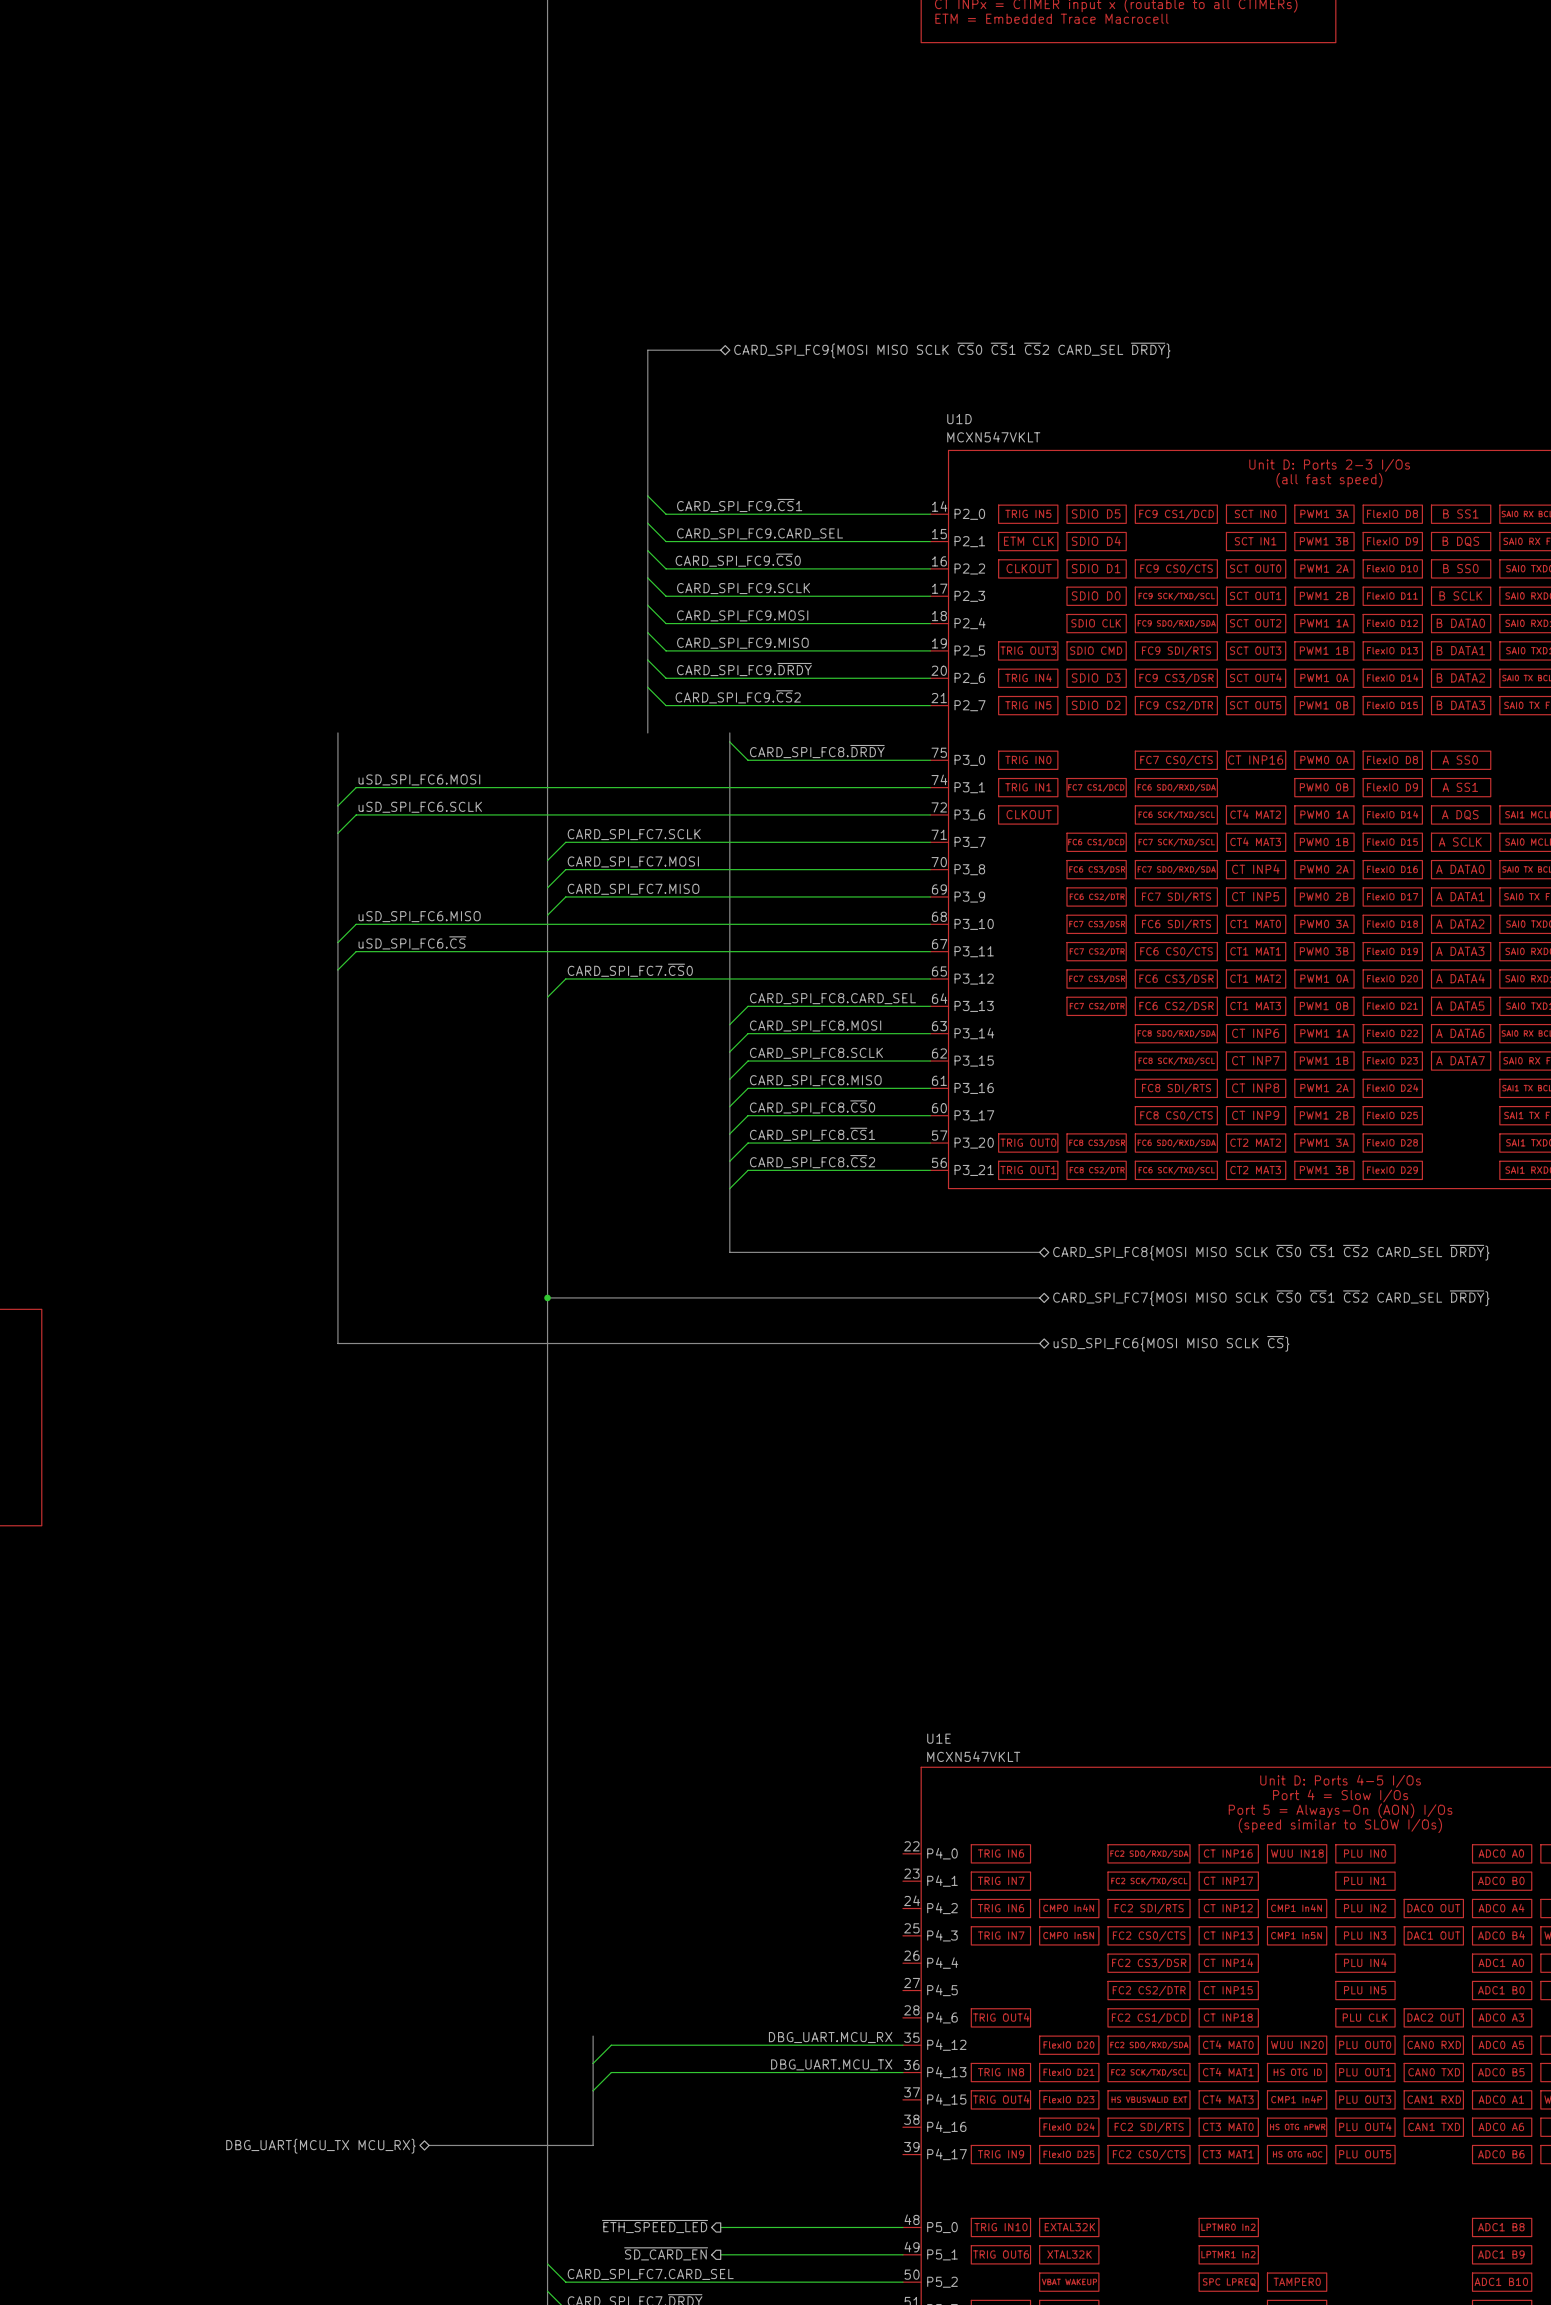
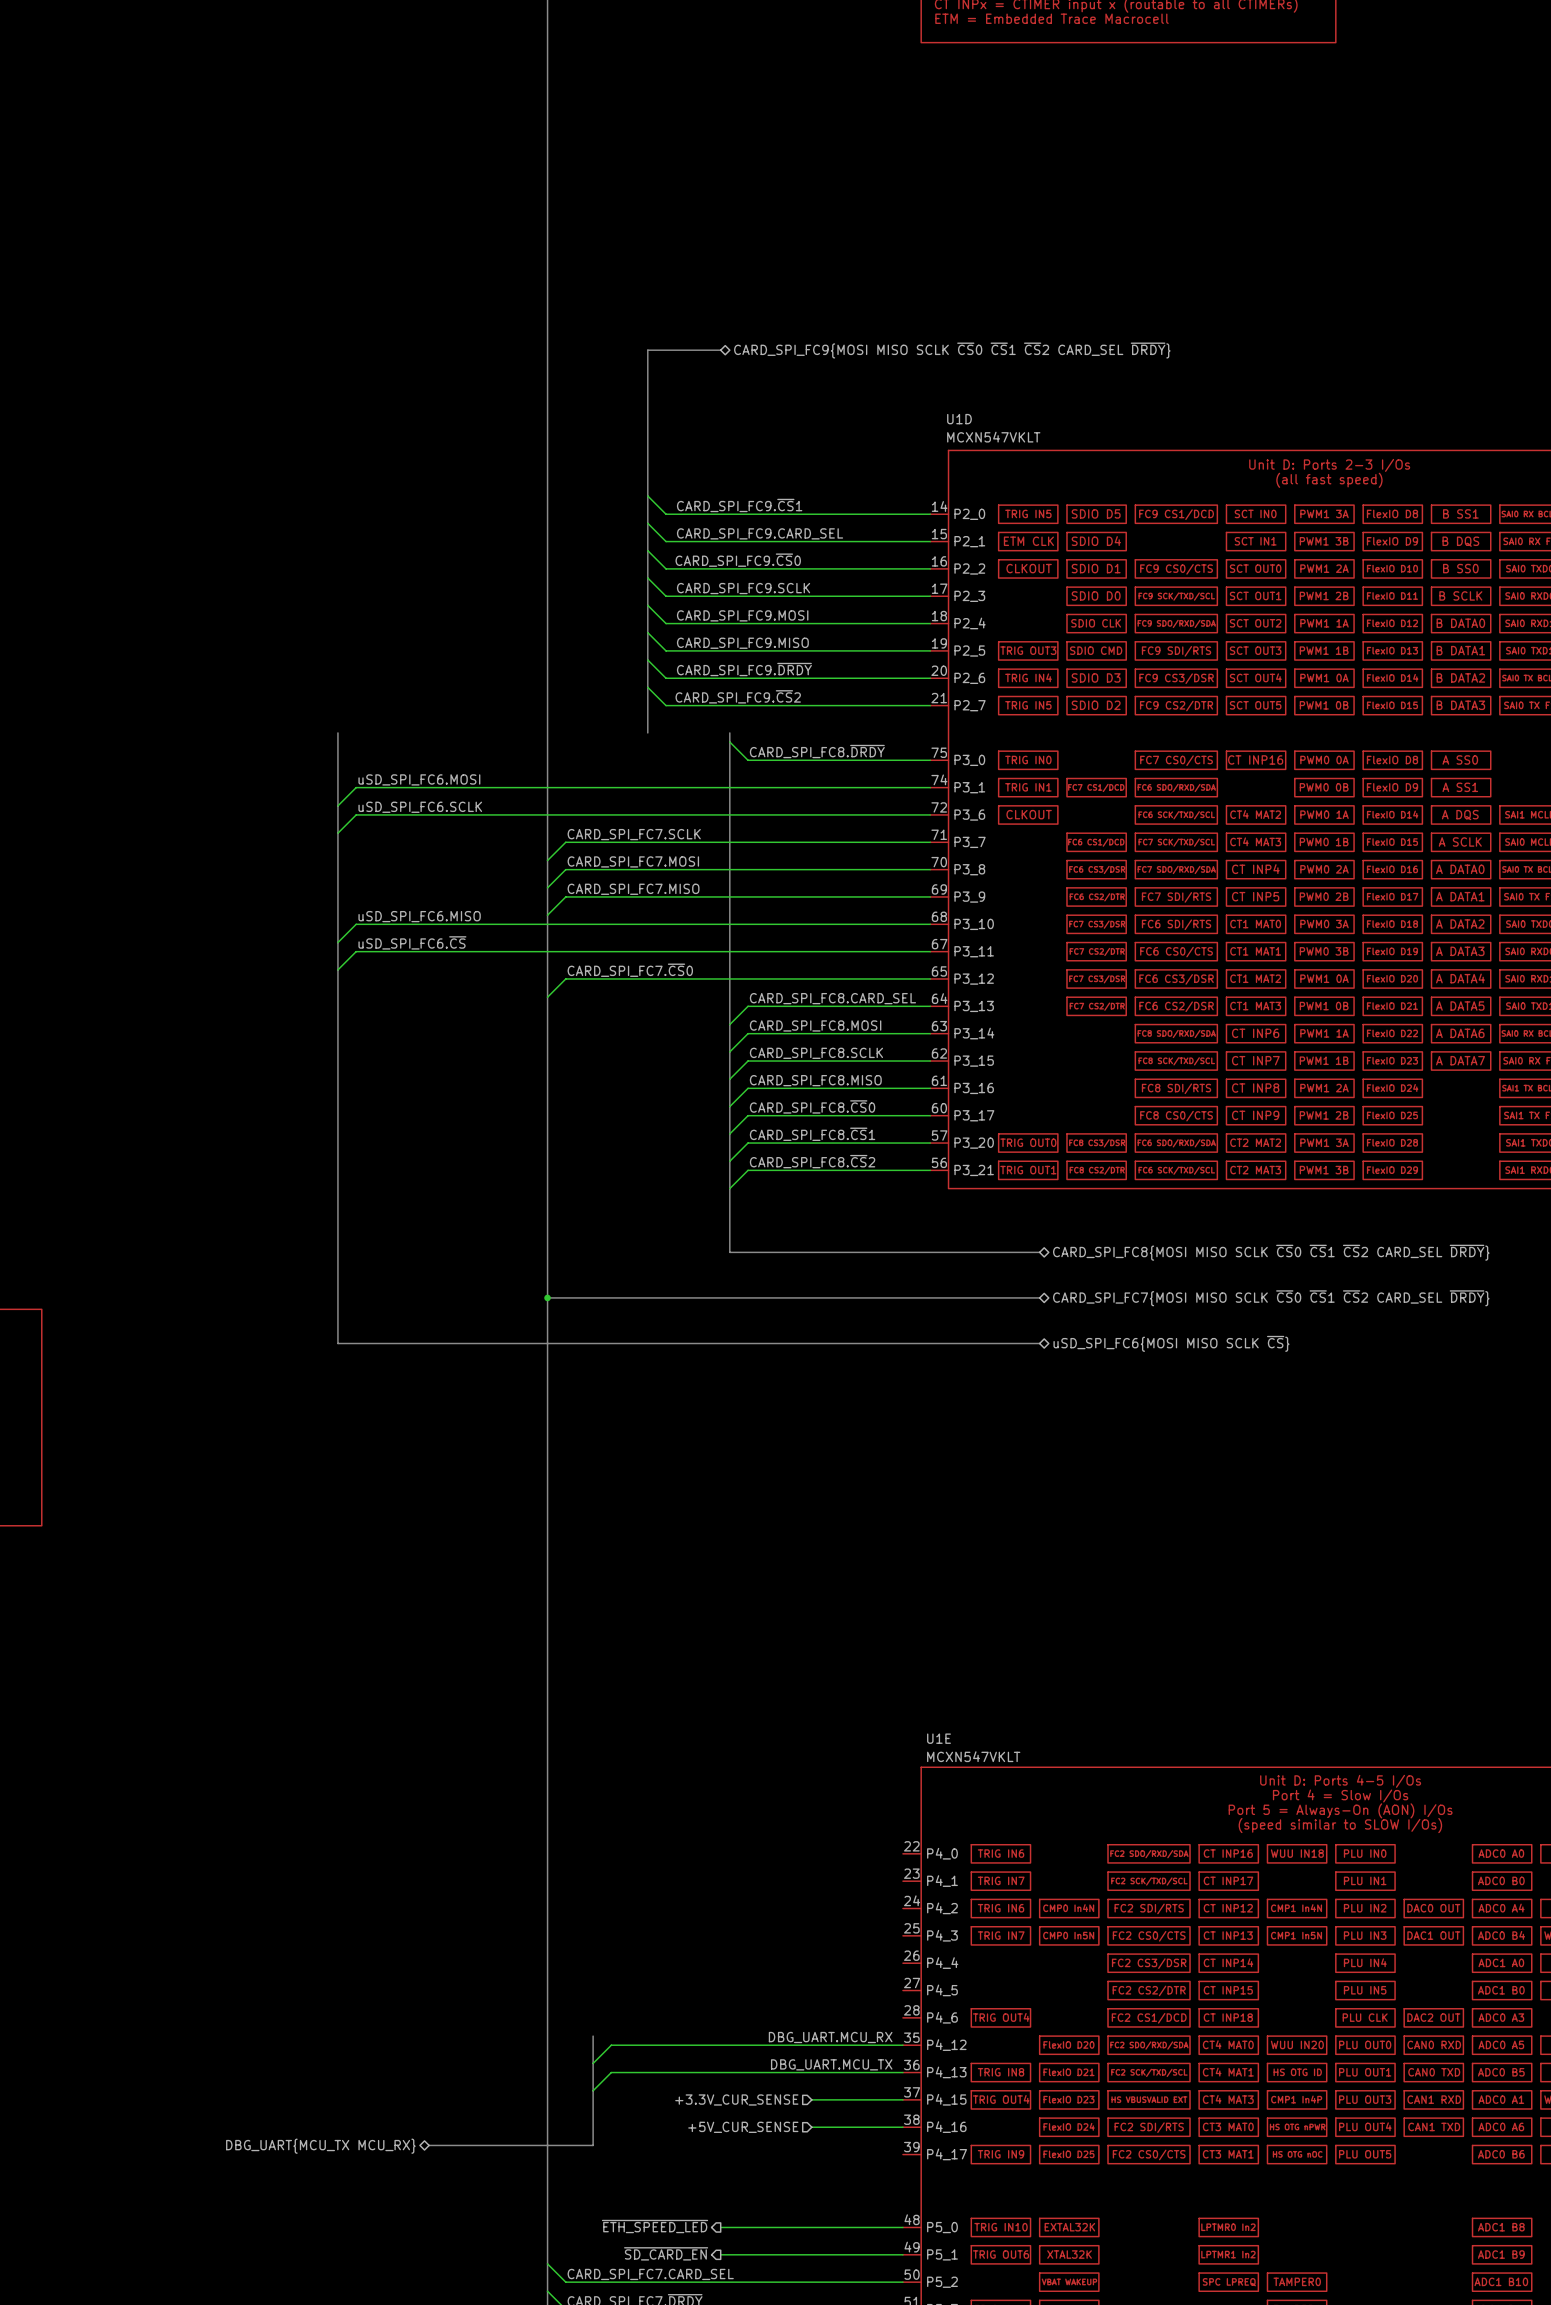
hierarchical label: none -> +3.3V_CUR_SENSE (736, 2099)
wire: none -> (811, 2099) (902, 2099)
hierarchical label: none -> +5V_CUR_SENSE (743, 2127)
wire: none -> (811, 2127) (902, 2127)

